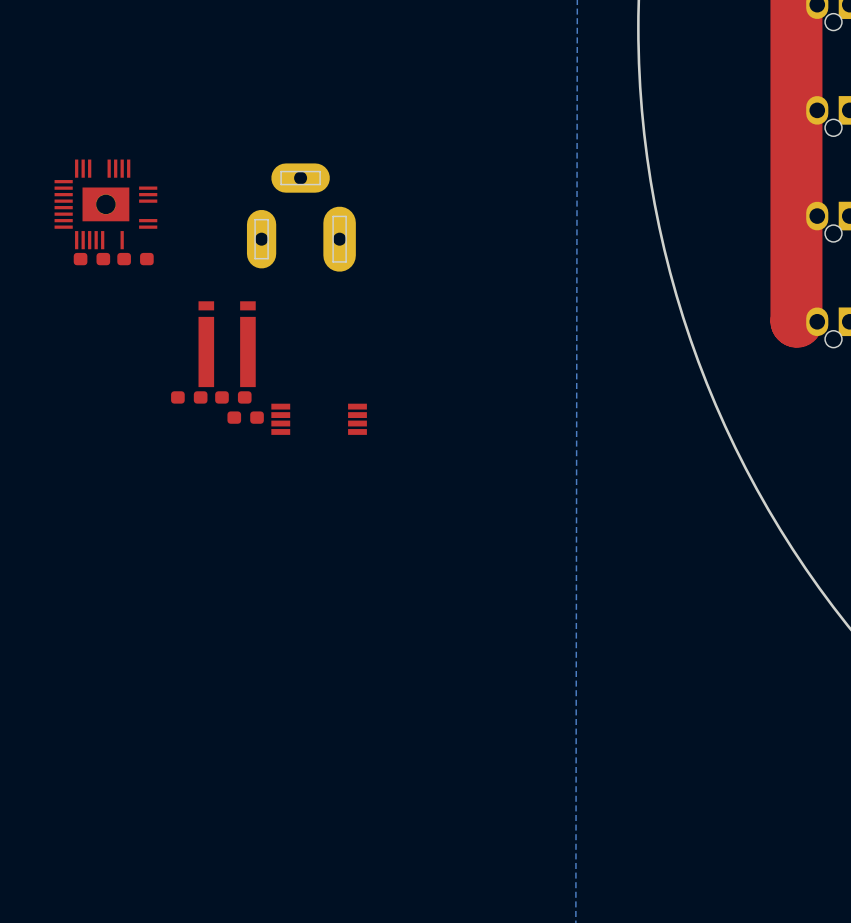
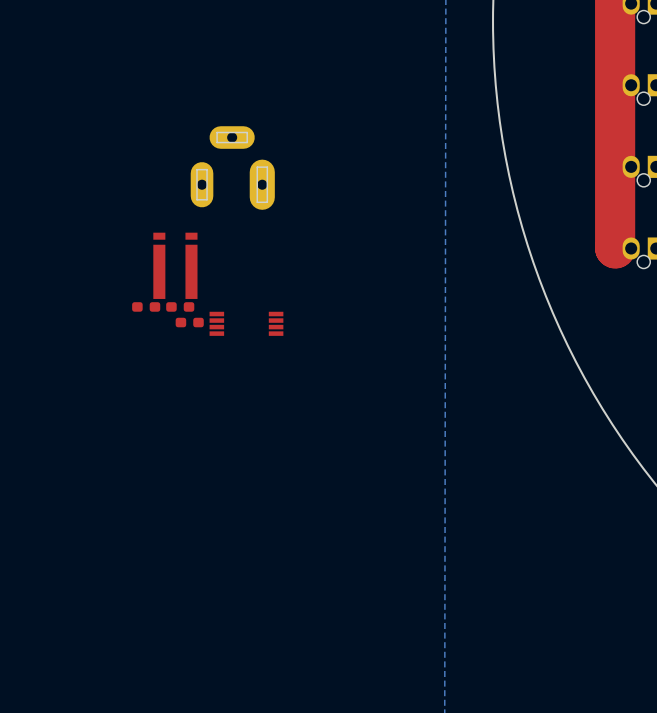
part: (105, 204) -> none
part: (91, 259) -> none
part: (135, 259) -> none

